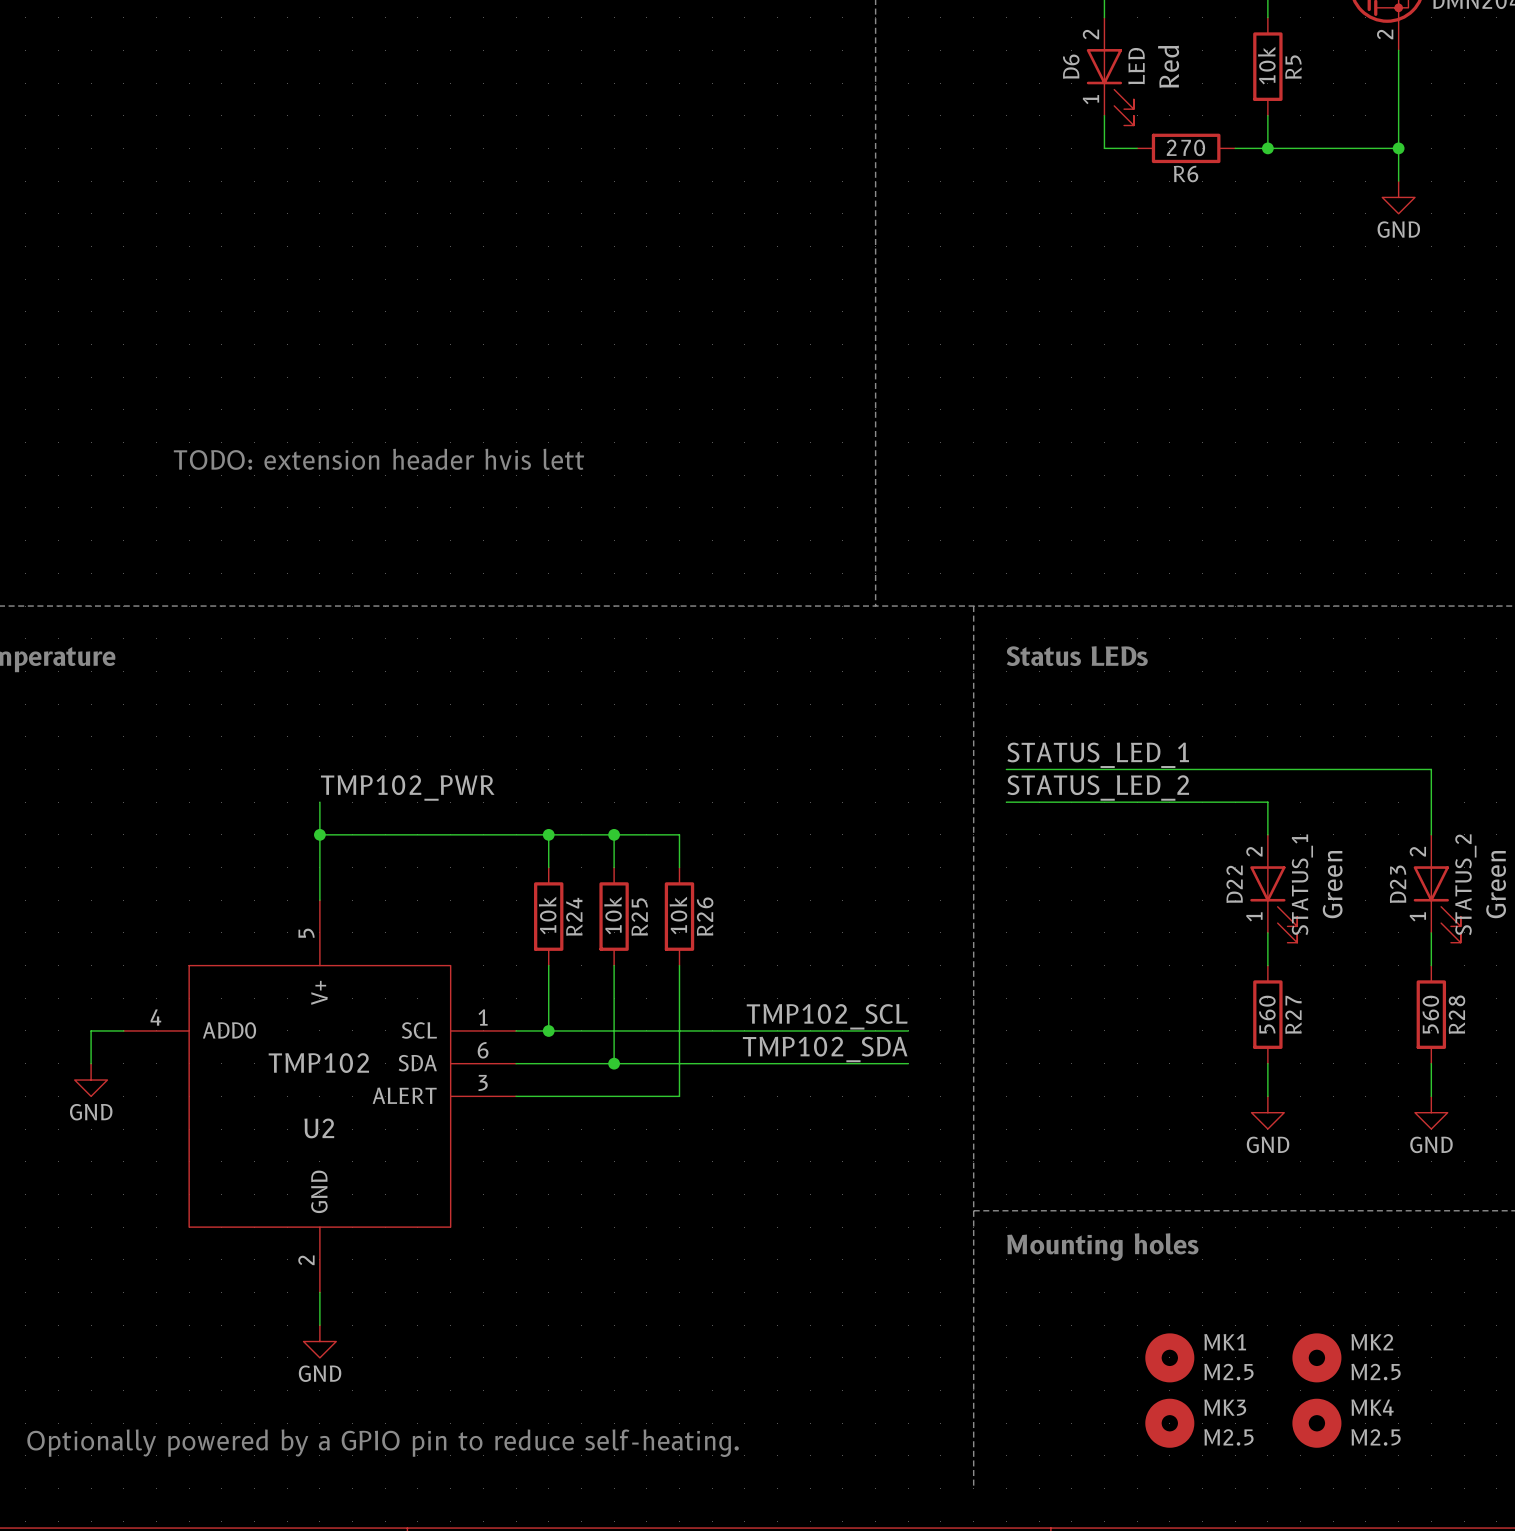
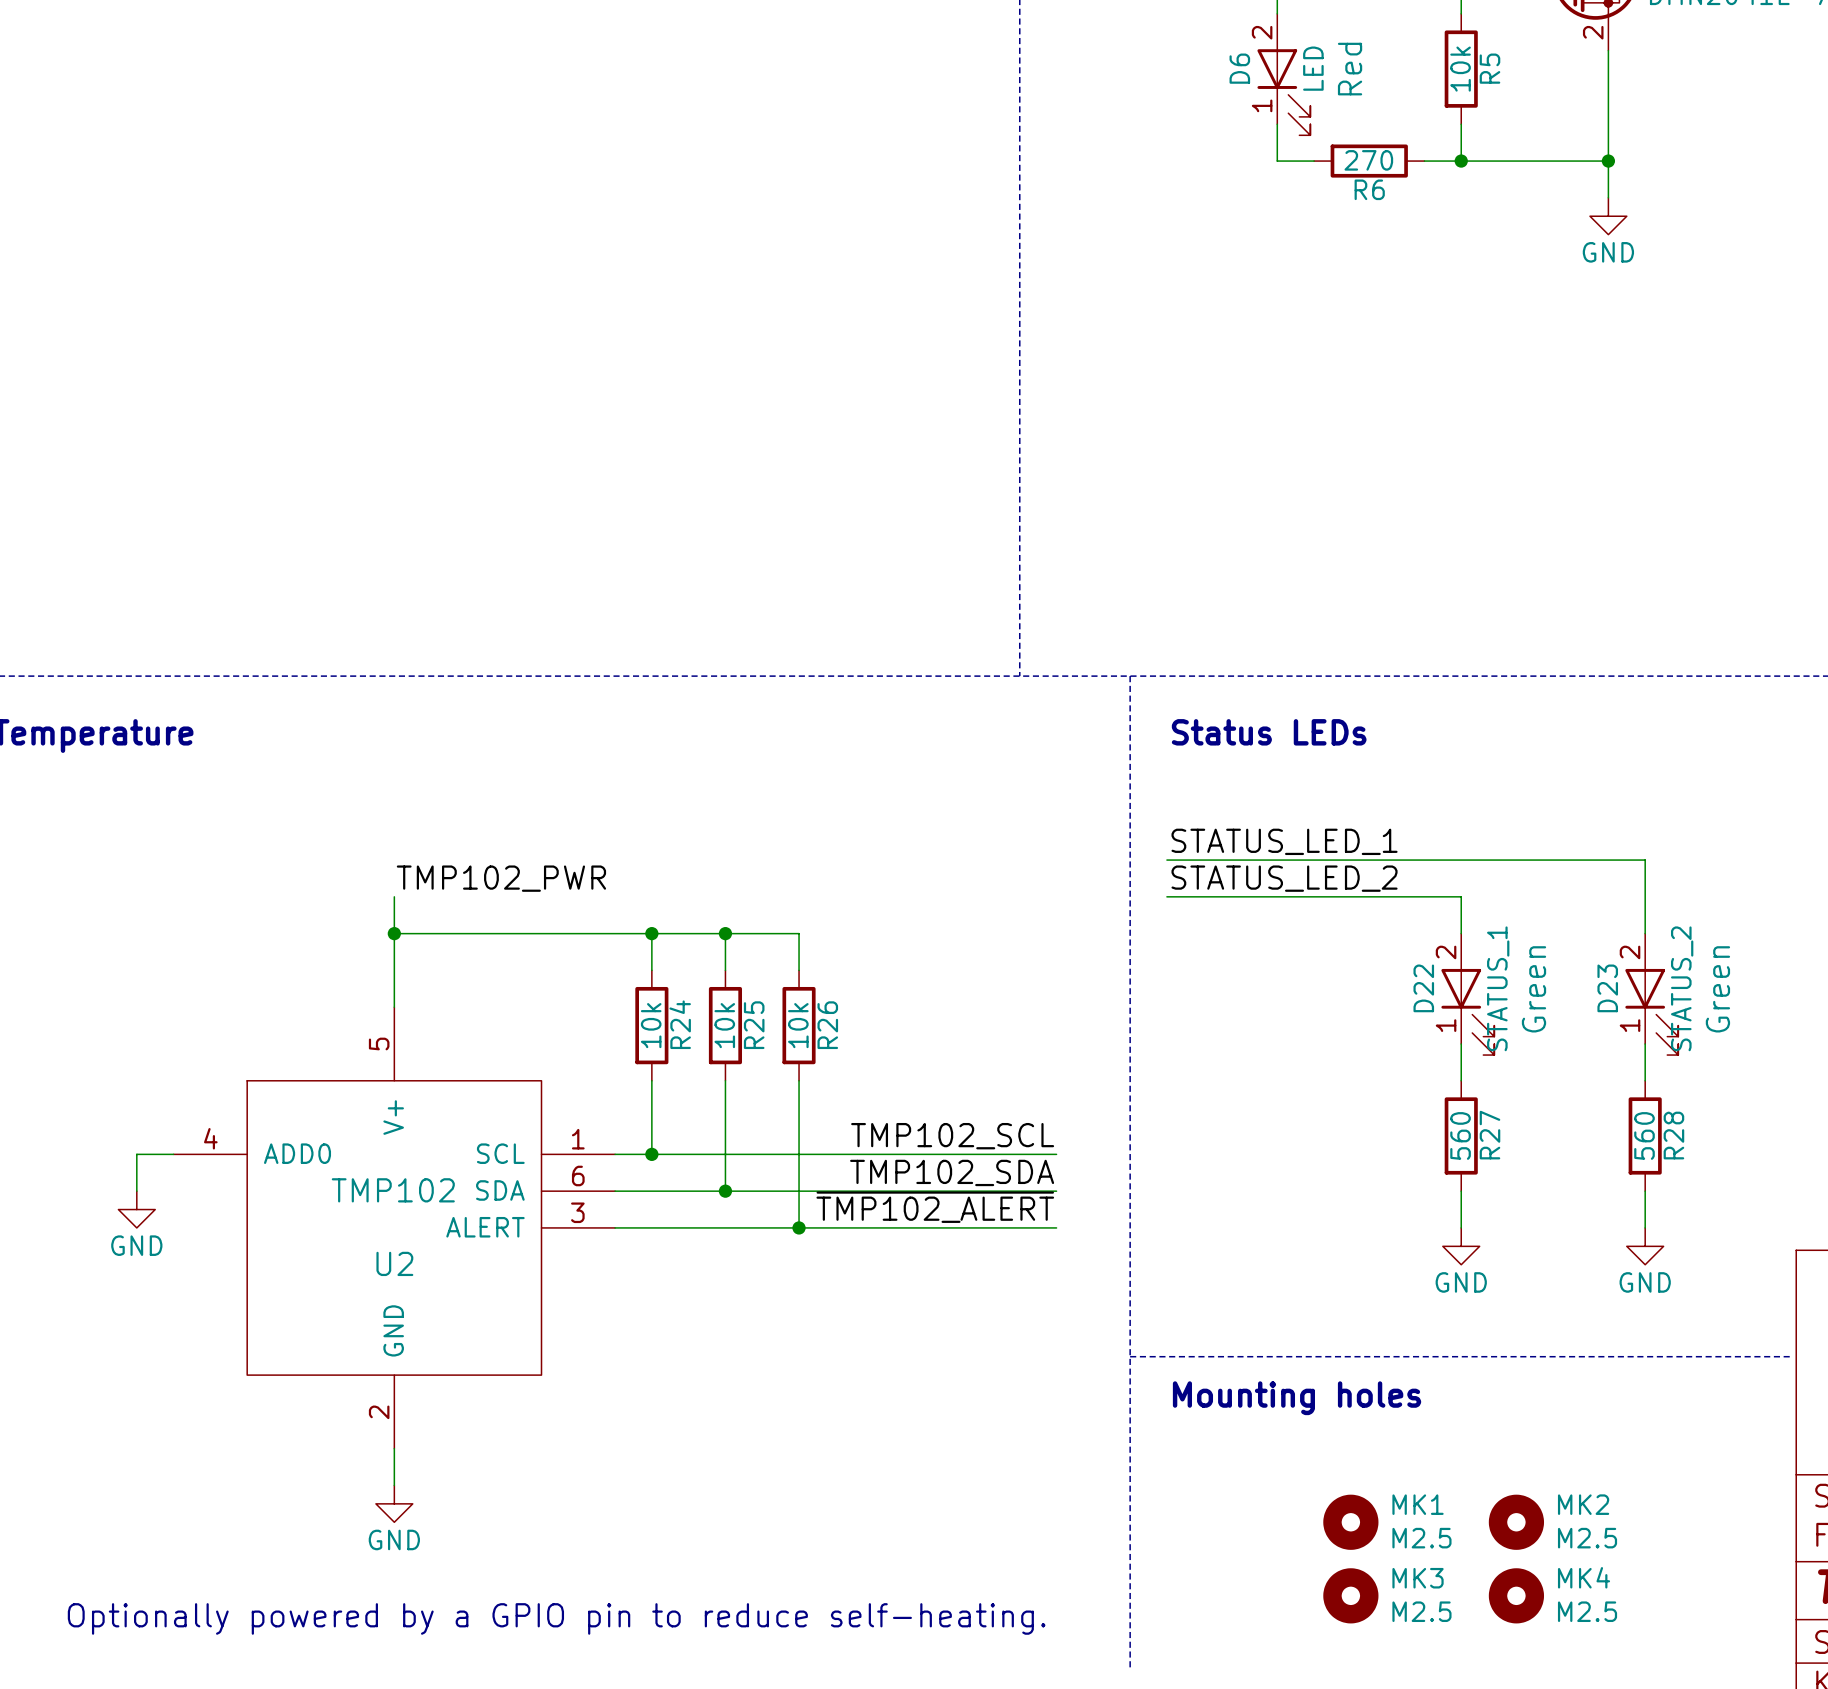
text: TODO: extension header hvis lett (378, 459) -> none
label: none -> ~{TMP102_ALERT} (935, 1207)
wire: none -> (799, 1227) (1056, 1227)
junction: none -> (799, 1227)

